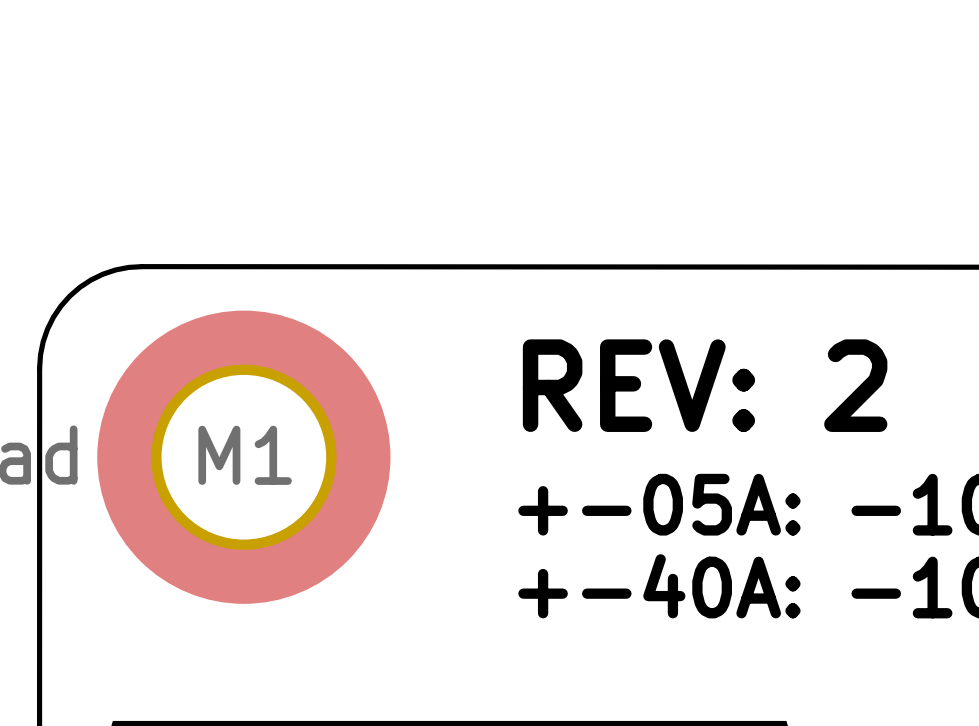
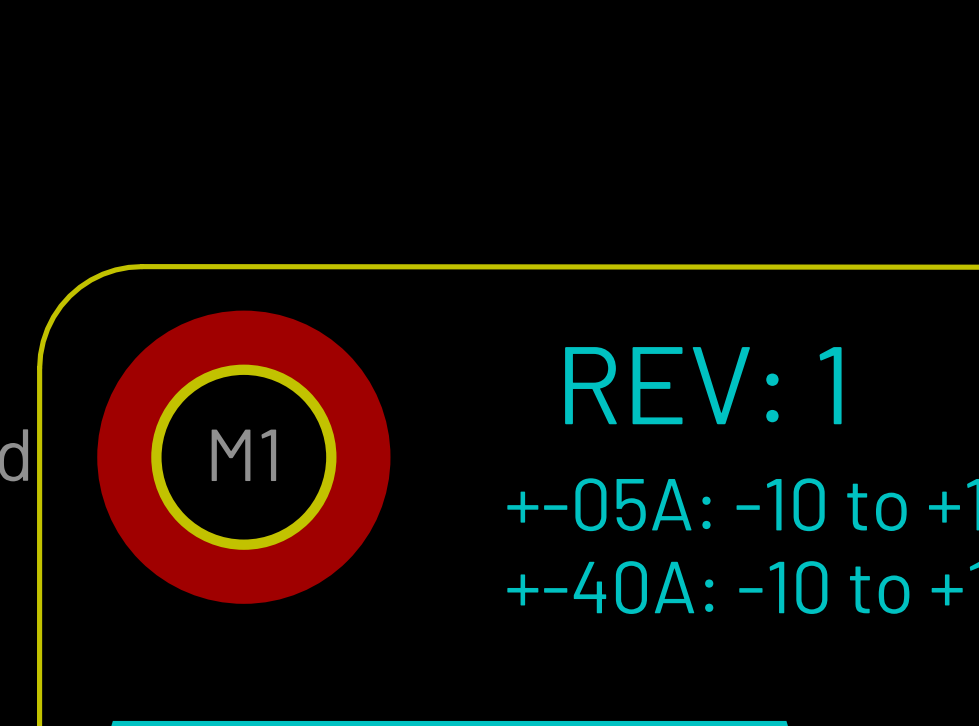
text: REV: 2 (705, 385) -> REV: 1 (703, 385)

